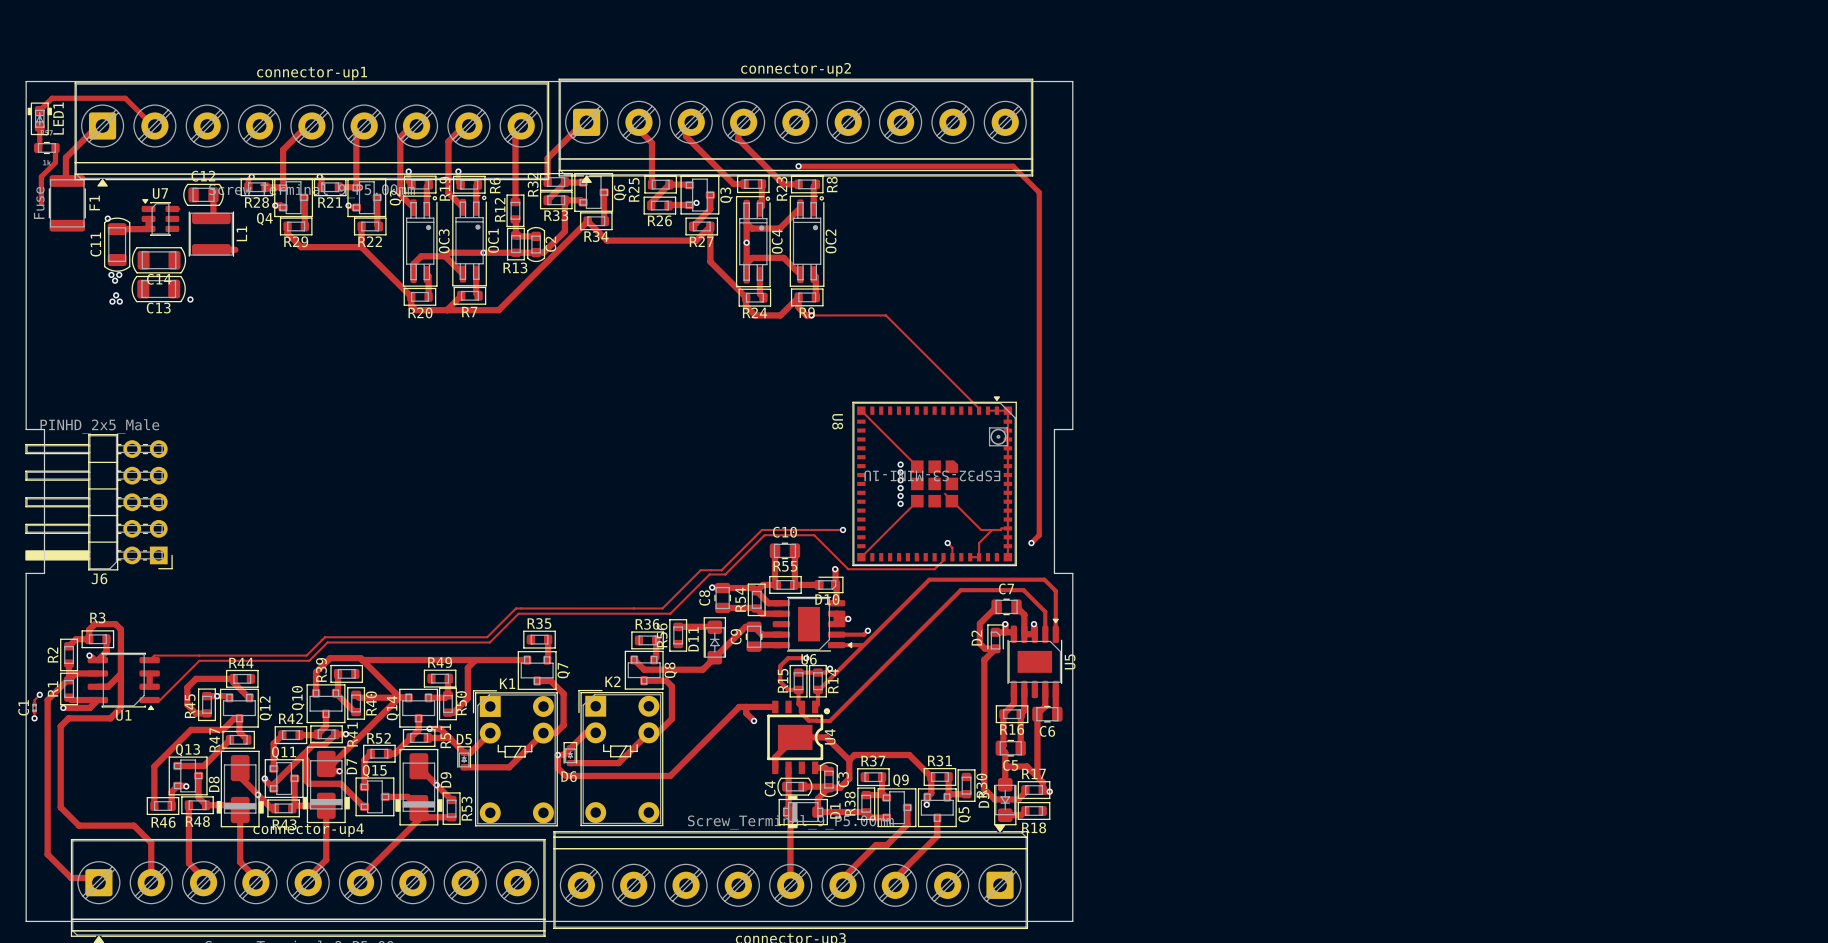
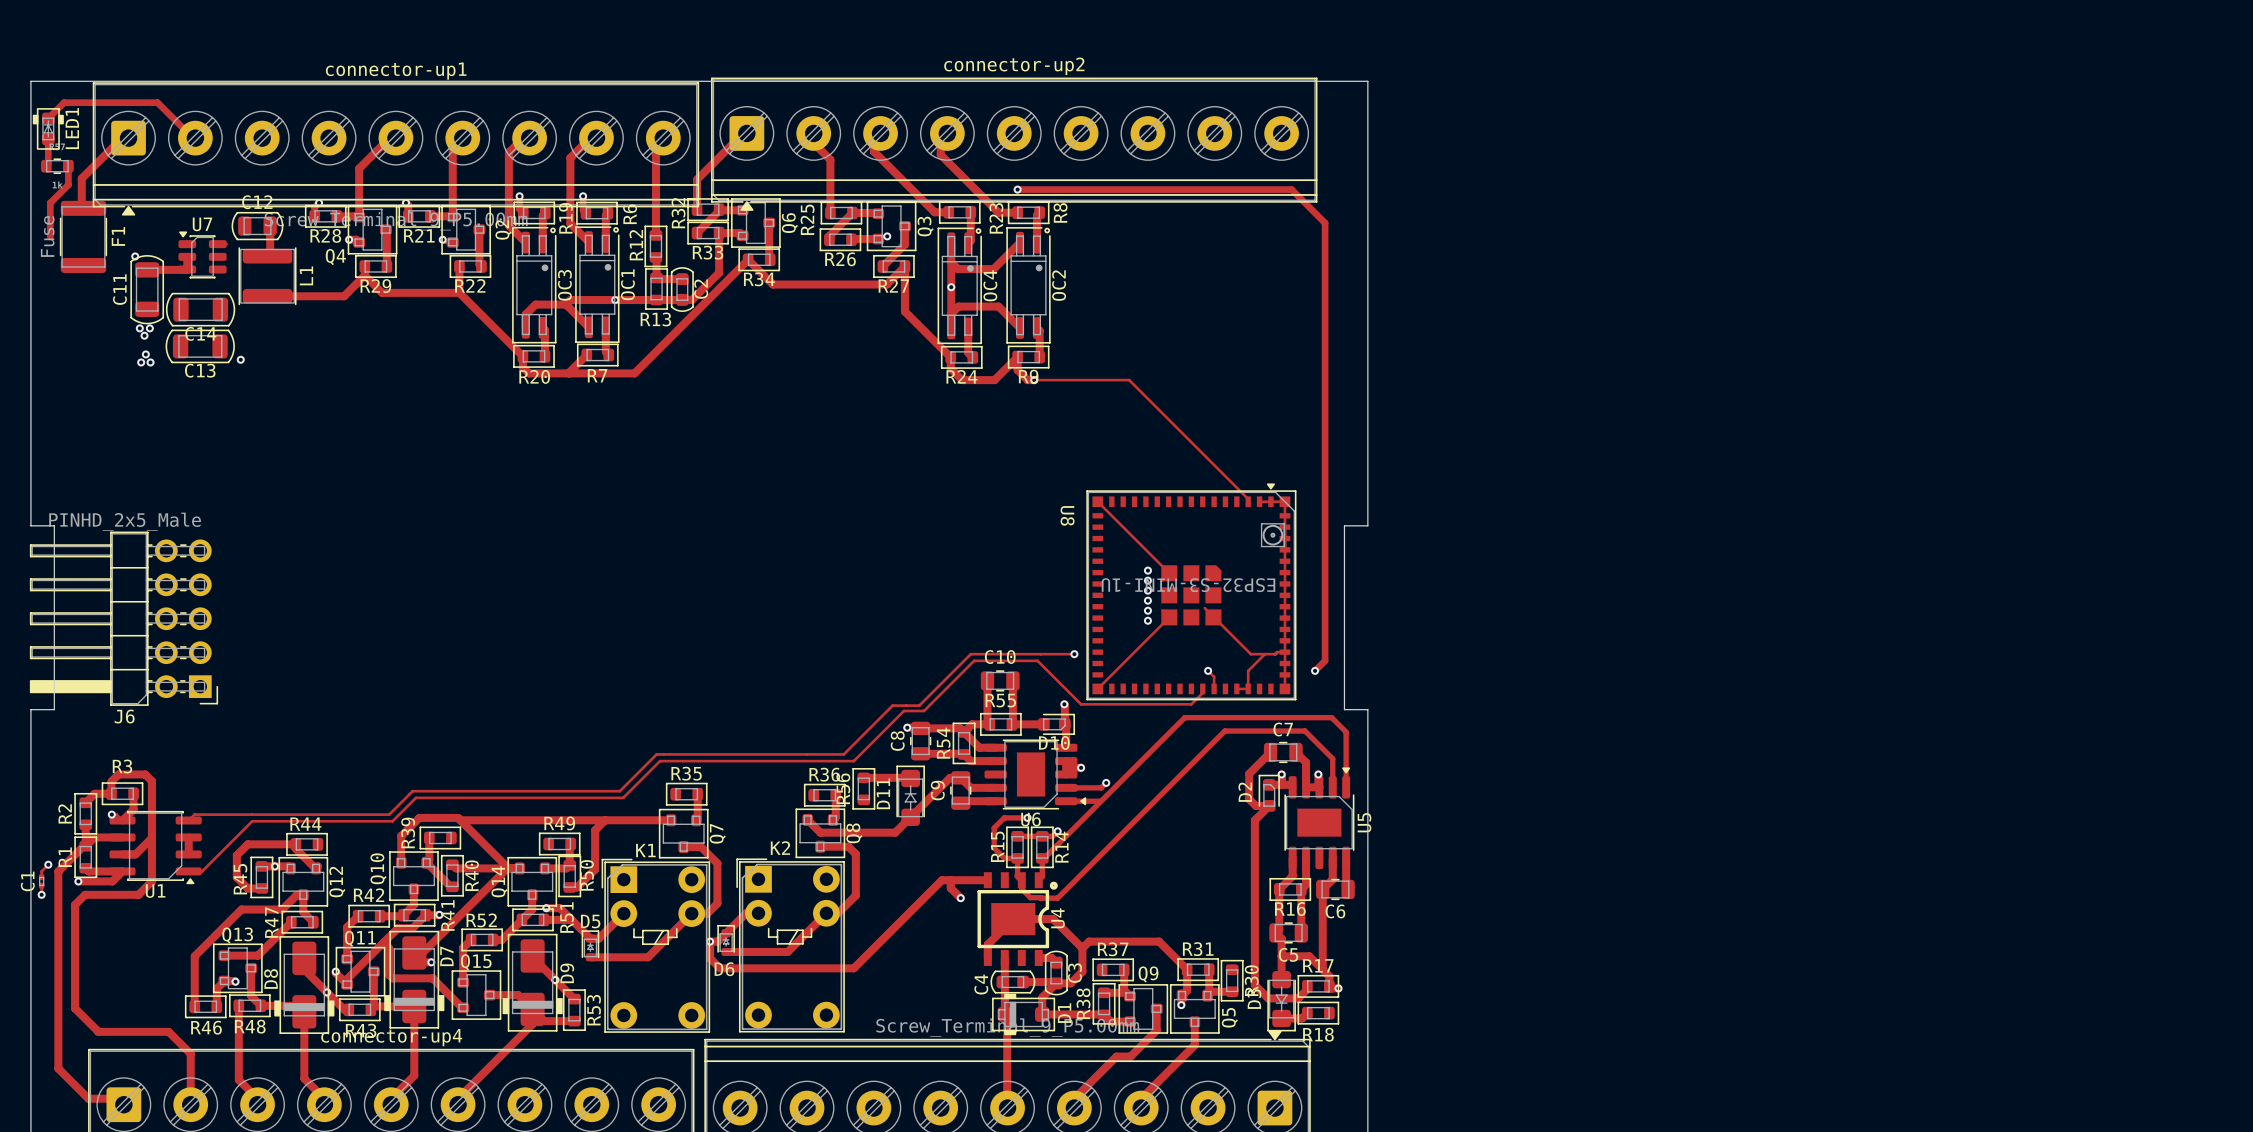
track: none -> (364, 275) (344, 296) (298, 296)

